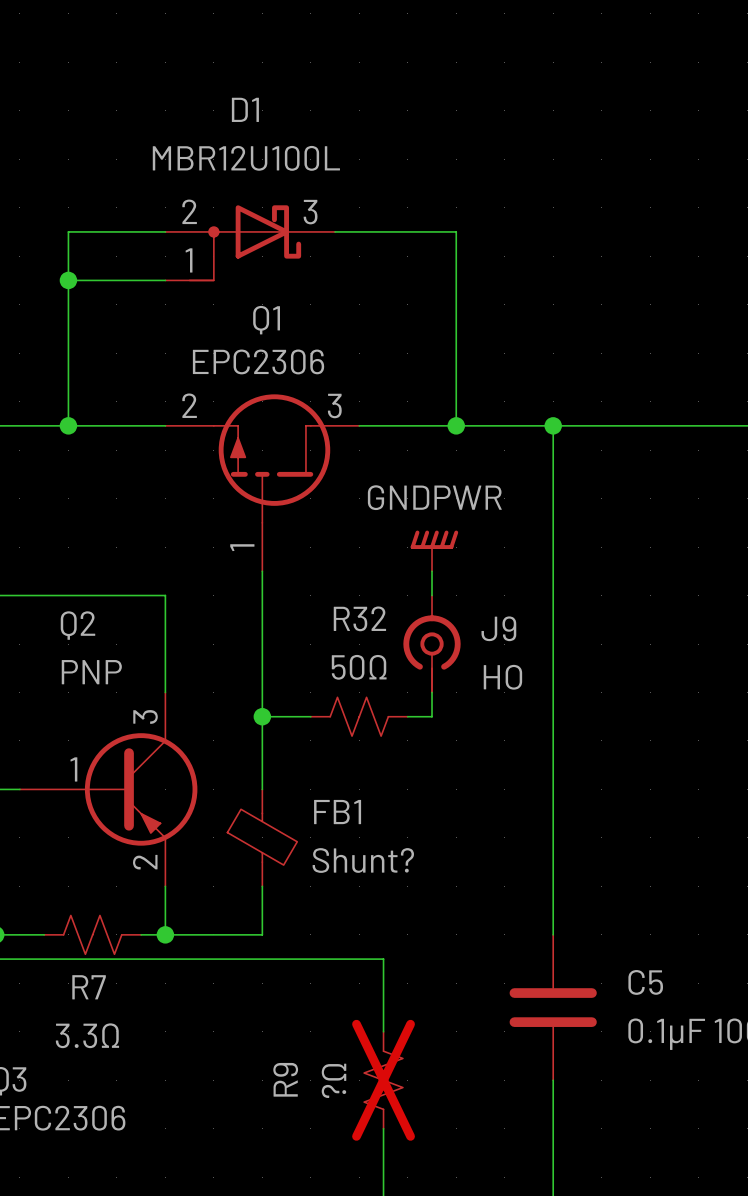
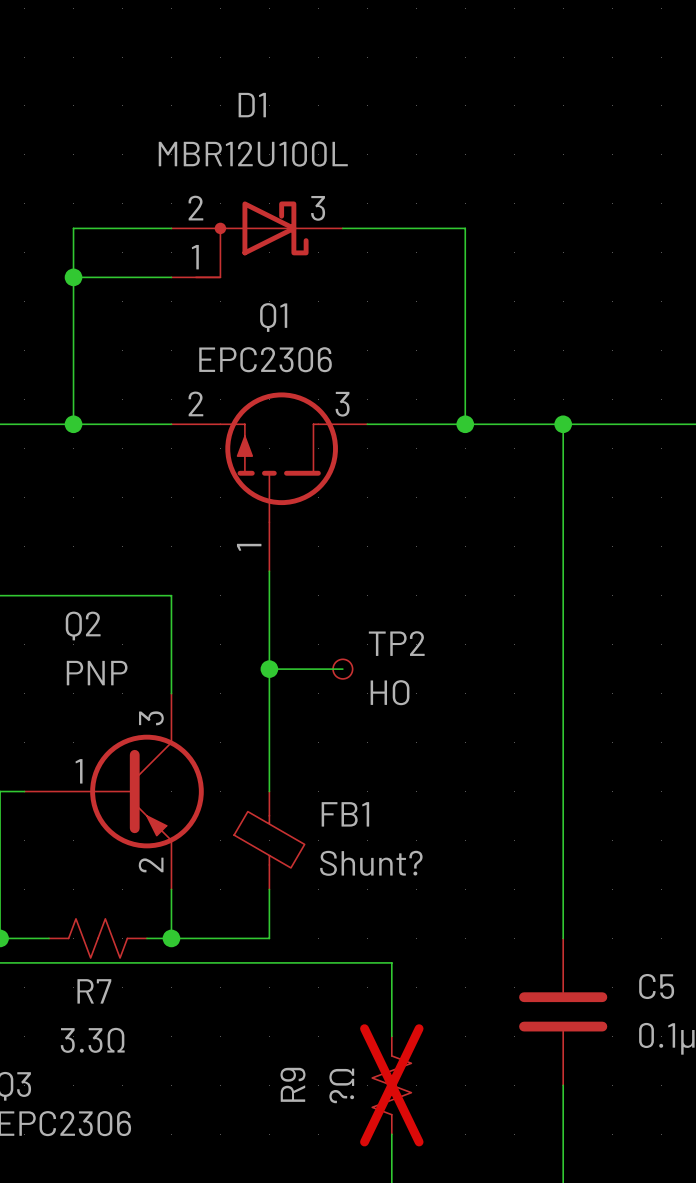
power symbol: GNDPWR (434, 550) -> none
wire: (432, 571) (432, 595) -> none
J9: HO (432, 644) -> none
wire: none -> (269, 669) (342, 669)
TP2: none -> HO (342, 669)
wire: (432, 692) (432, 716) (407, 716) -> none
wire: (262, 716) (310, 716) -> none
junction position: (262, 716) -> (269, 669)
R32: 50Ω (359, 716) -> none

